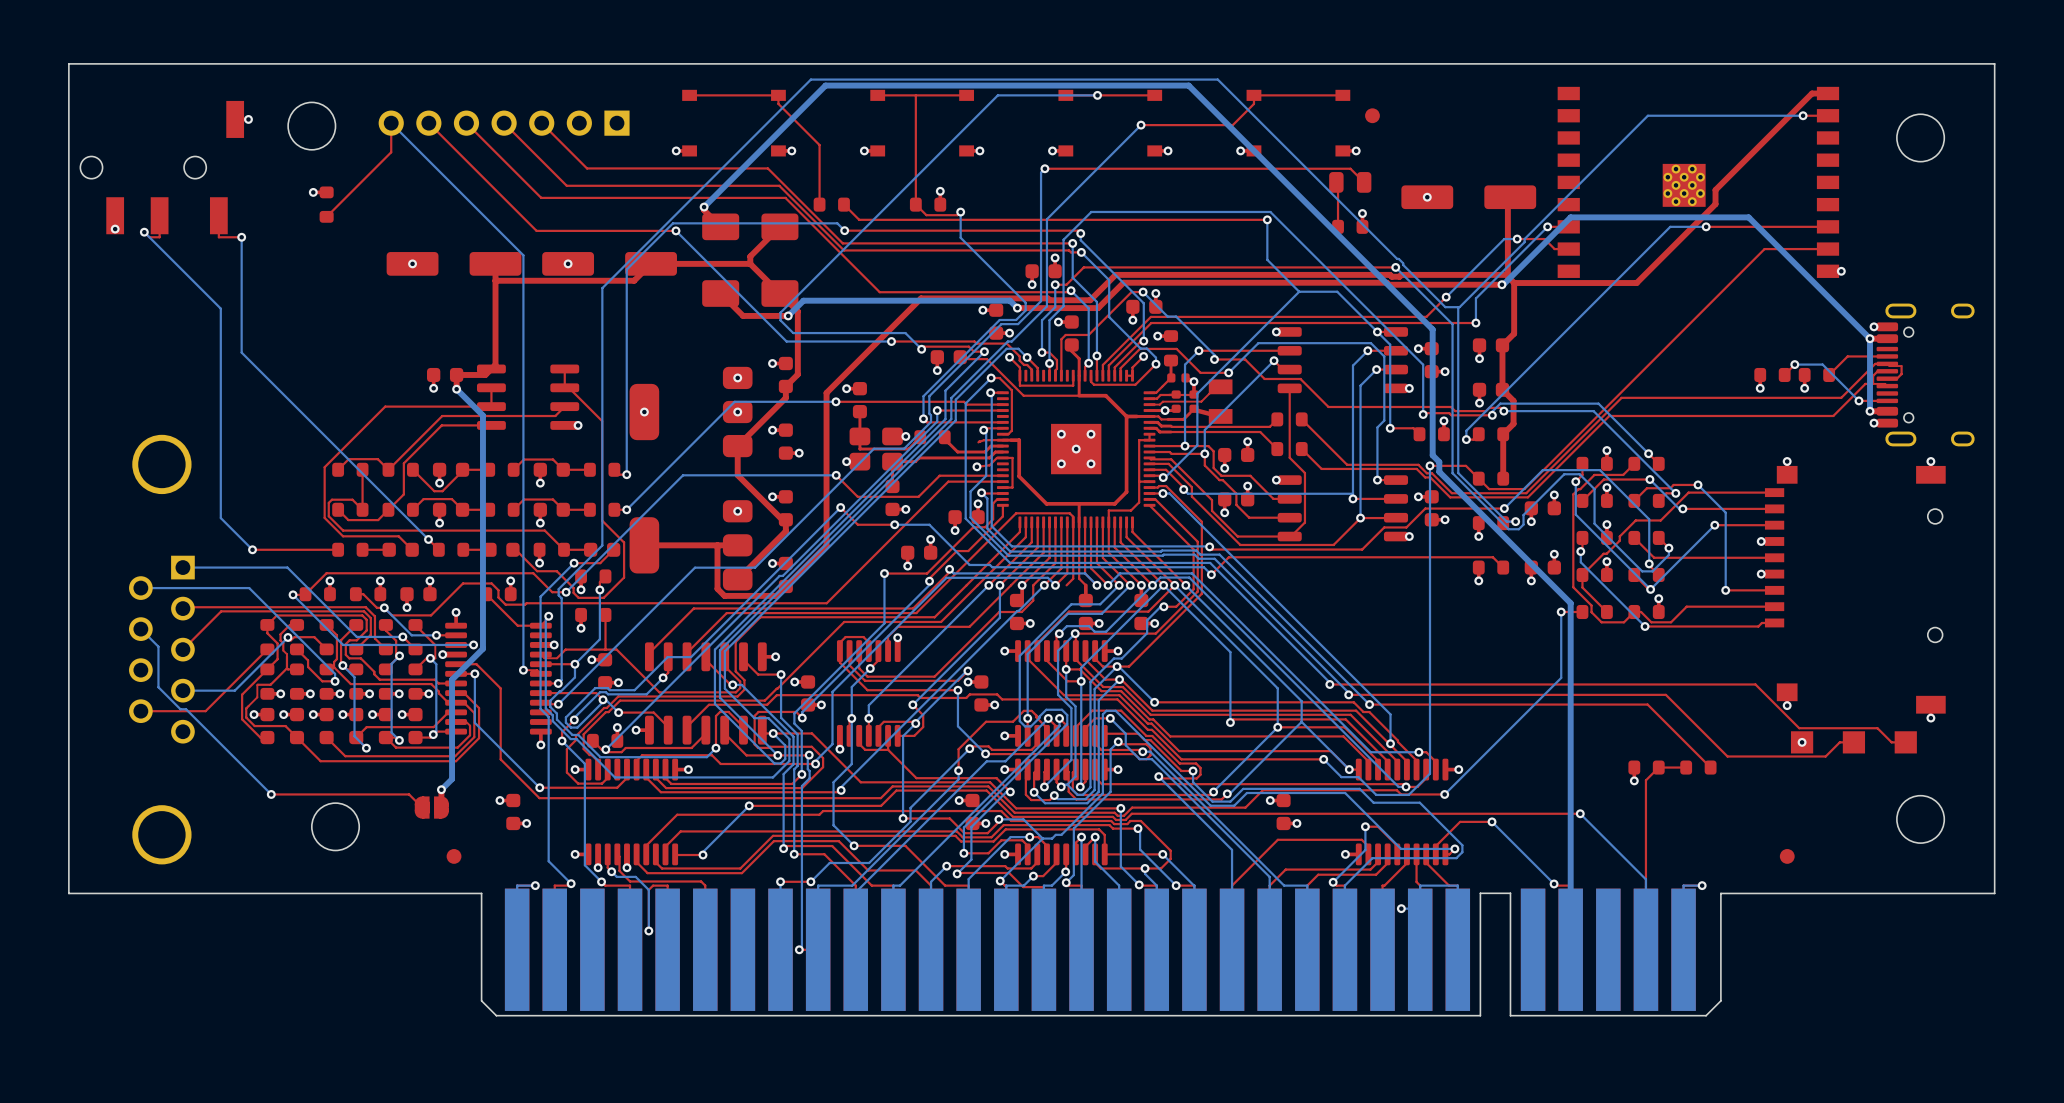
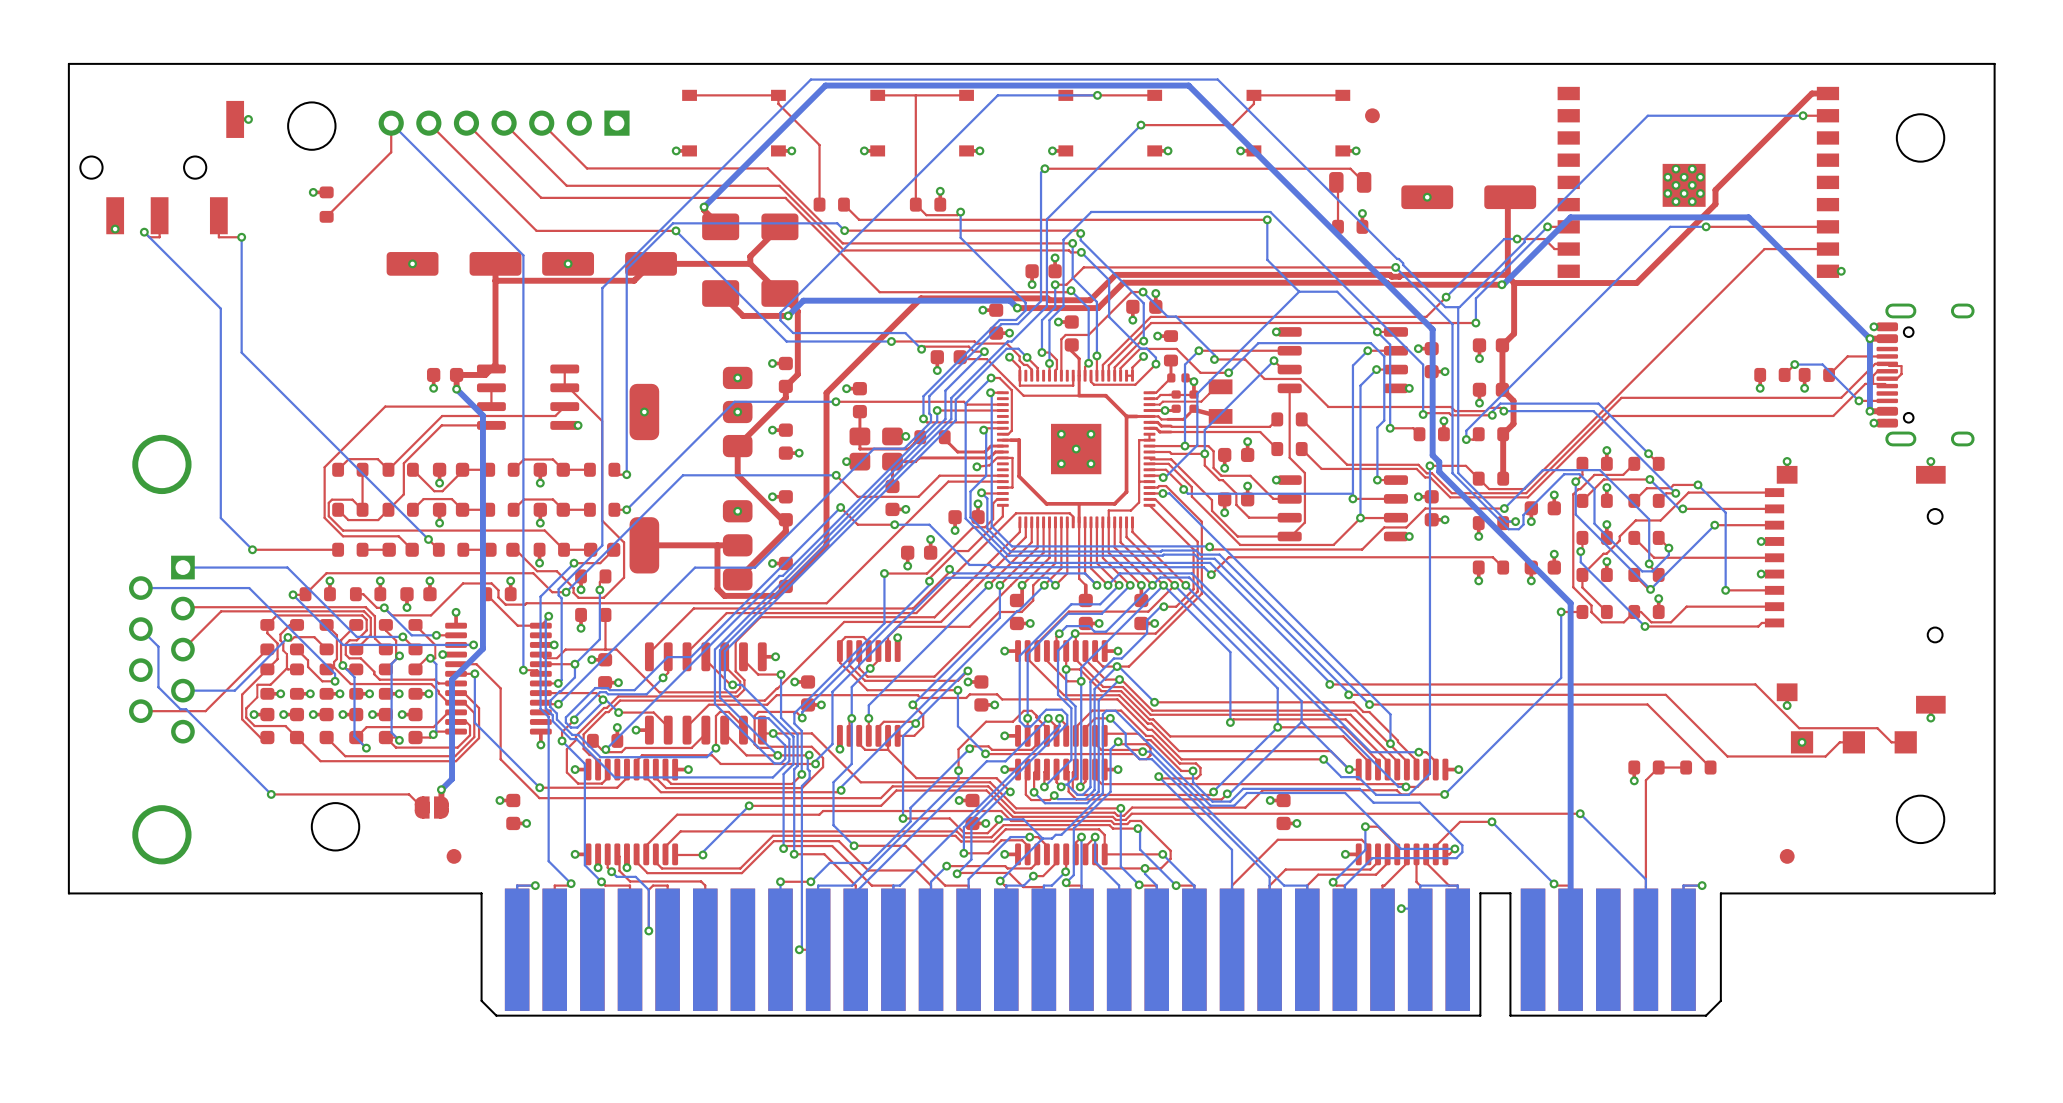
top track: (1002, 440) (984, 440) (978, 442) -> none
top track: (1073, 522) (1073, 578) (1066, 585) -> none

